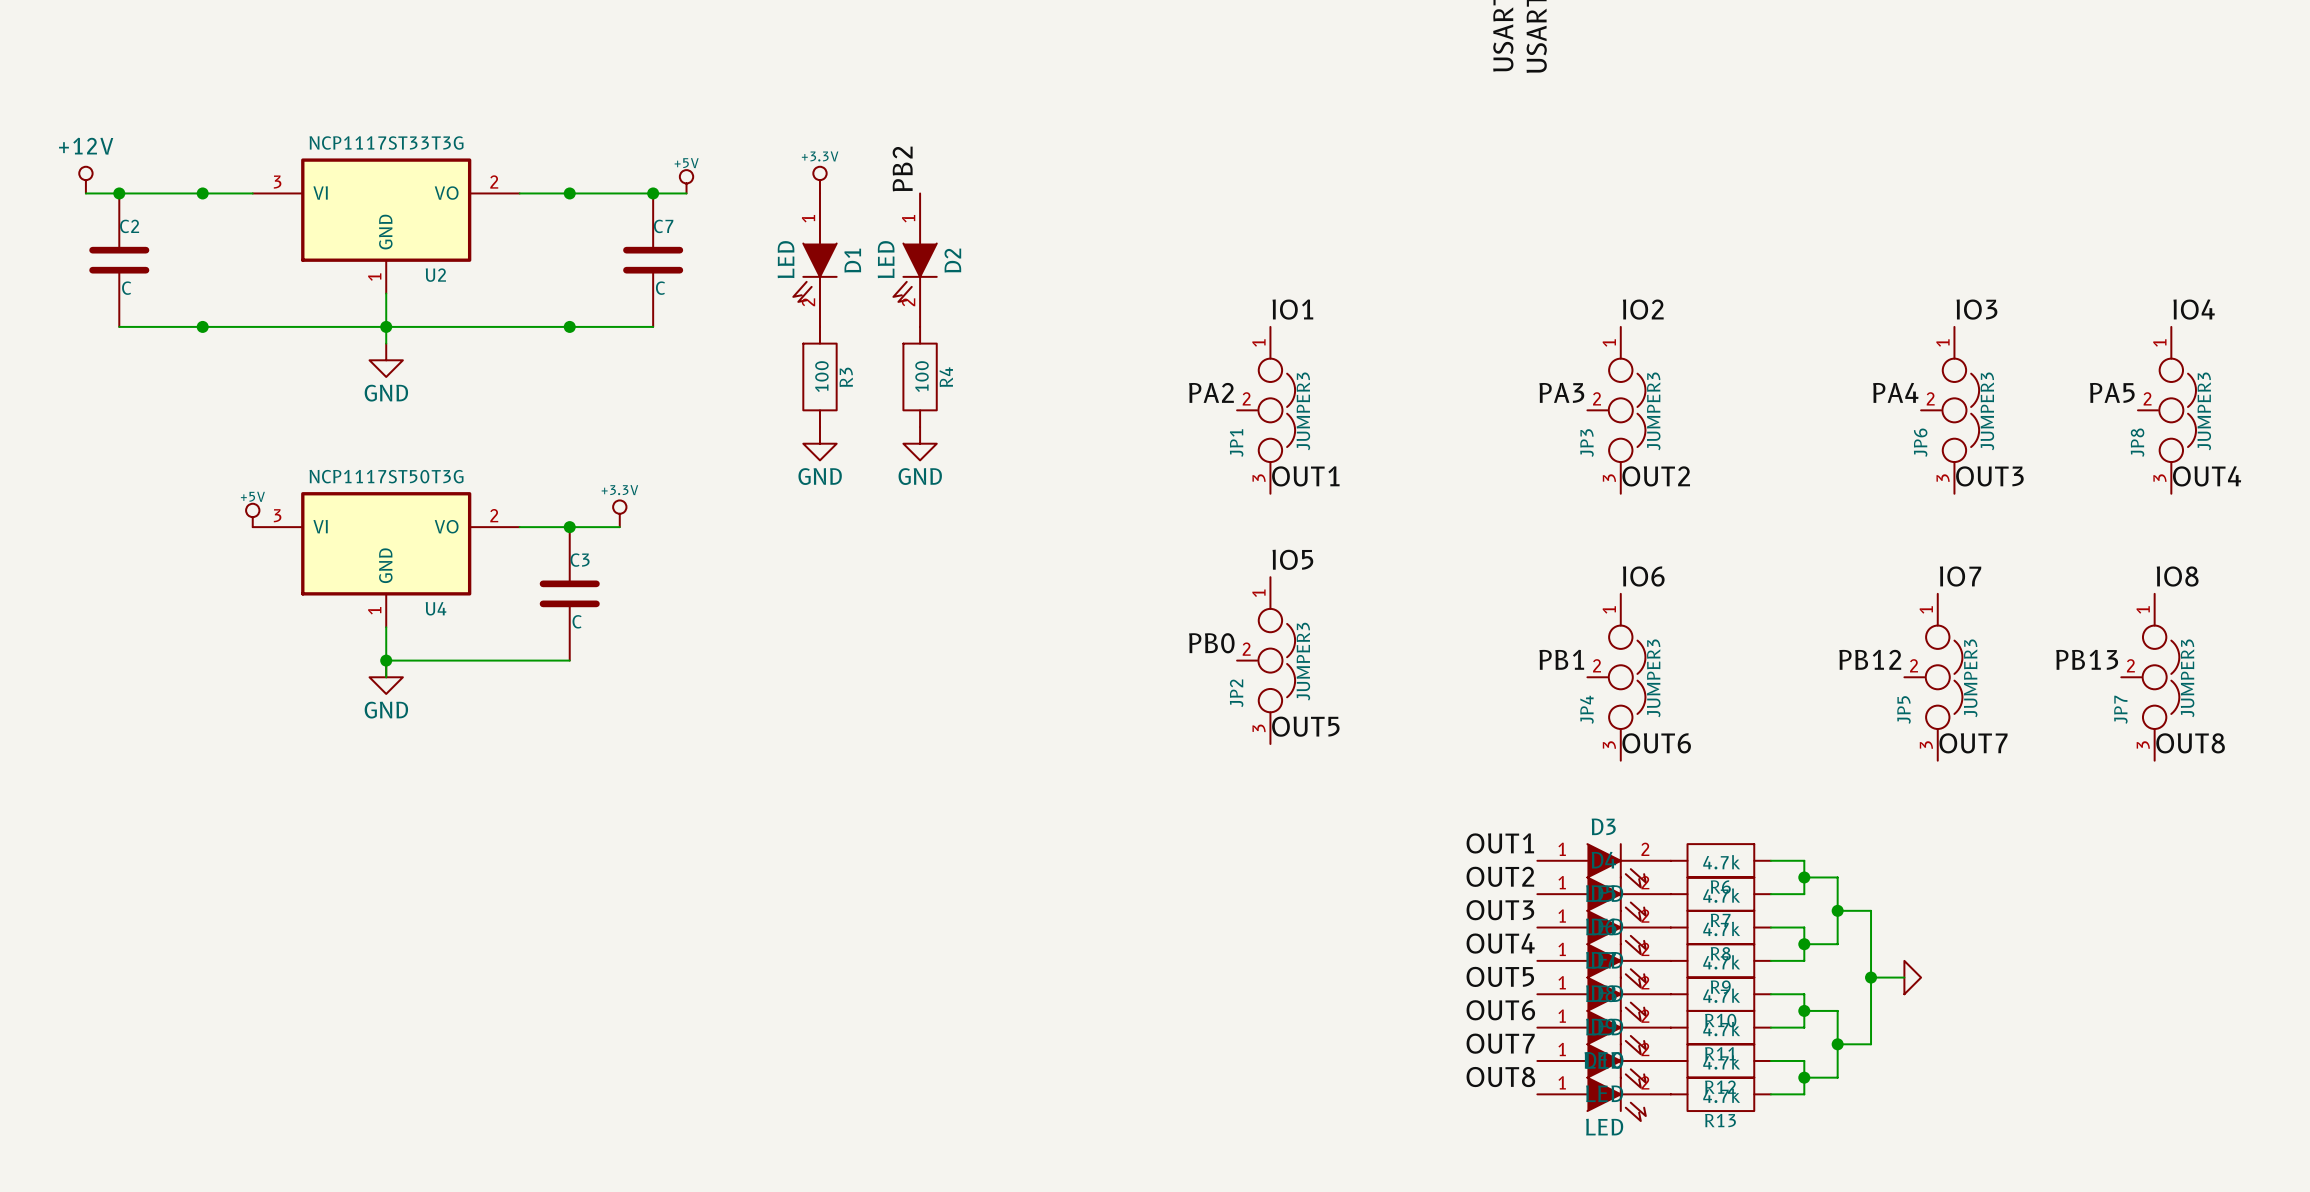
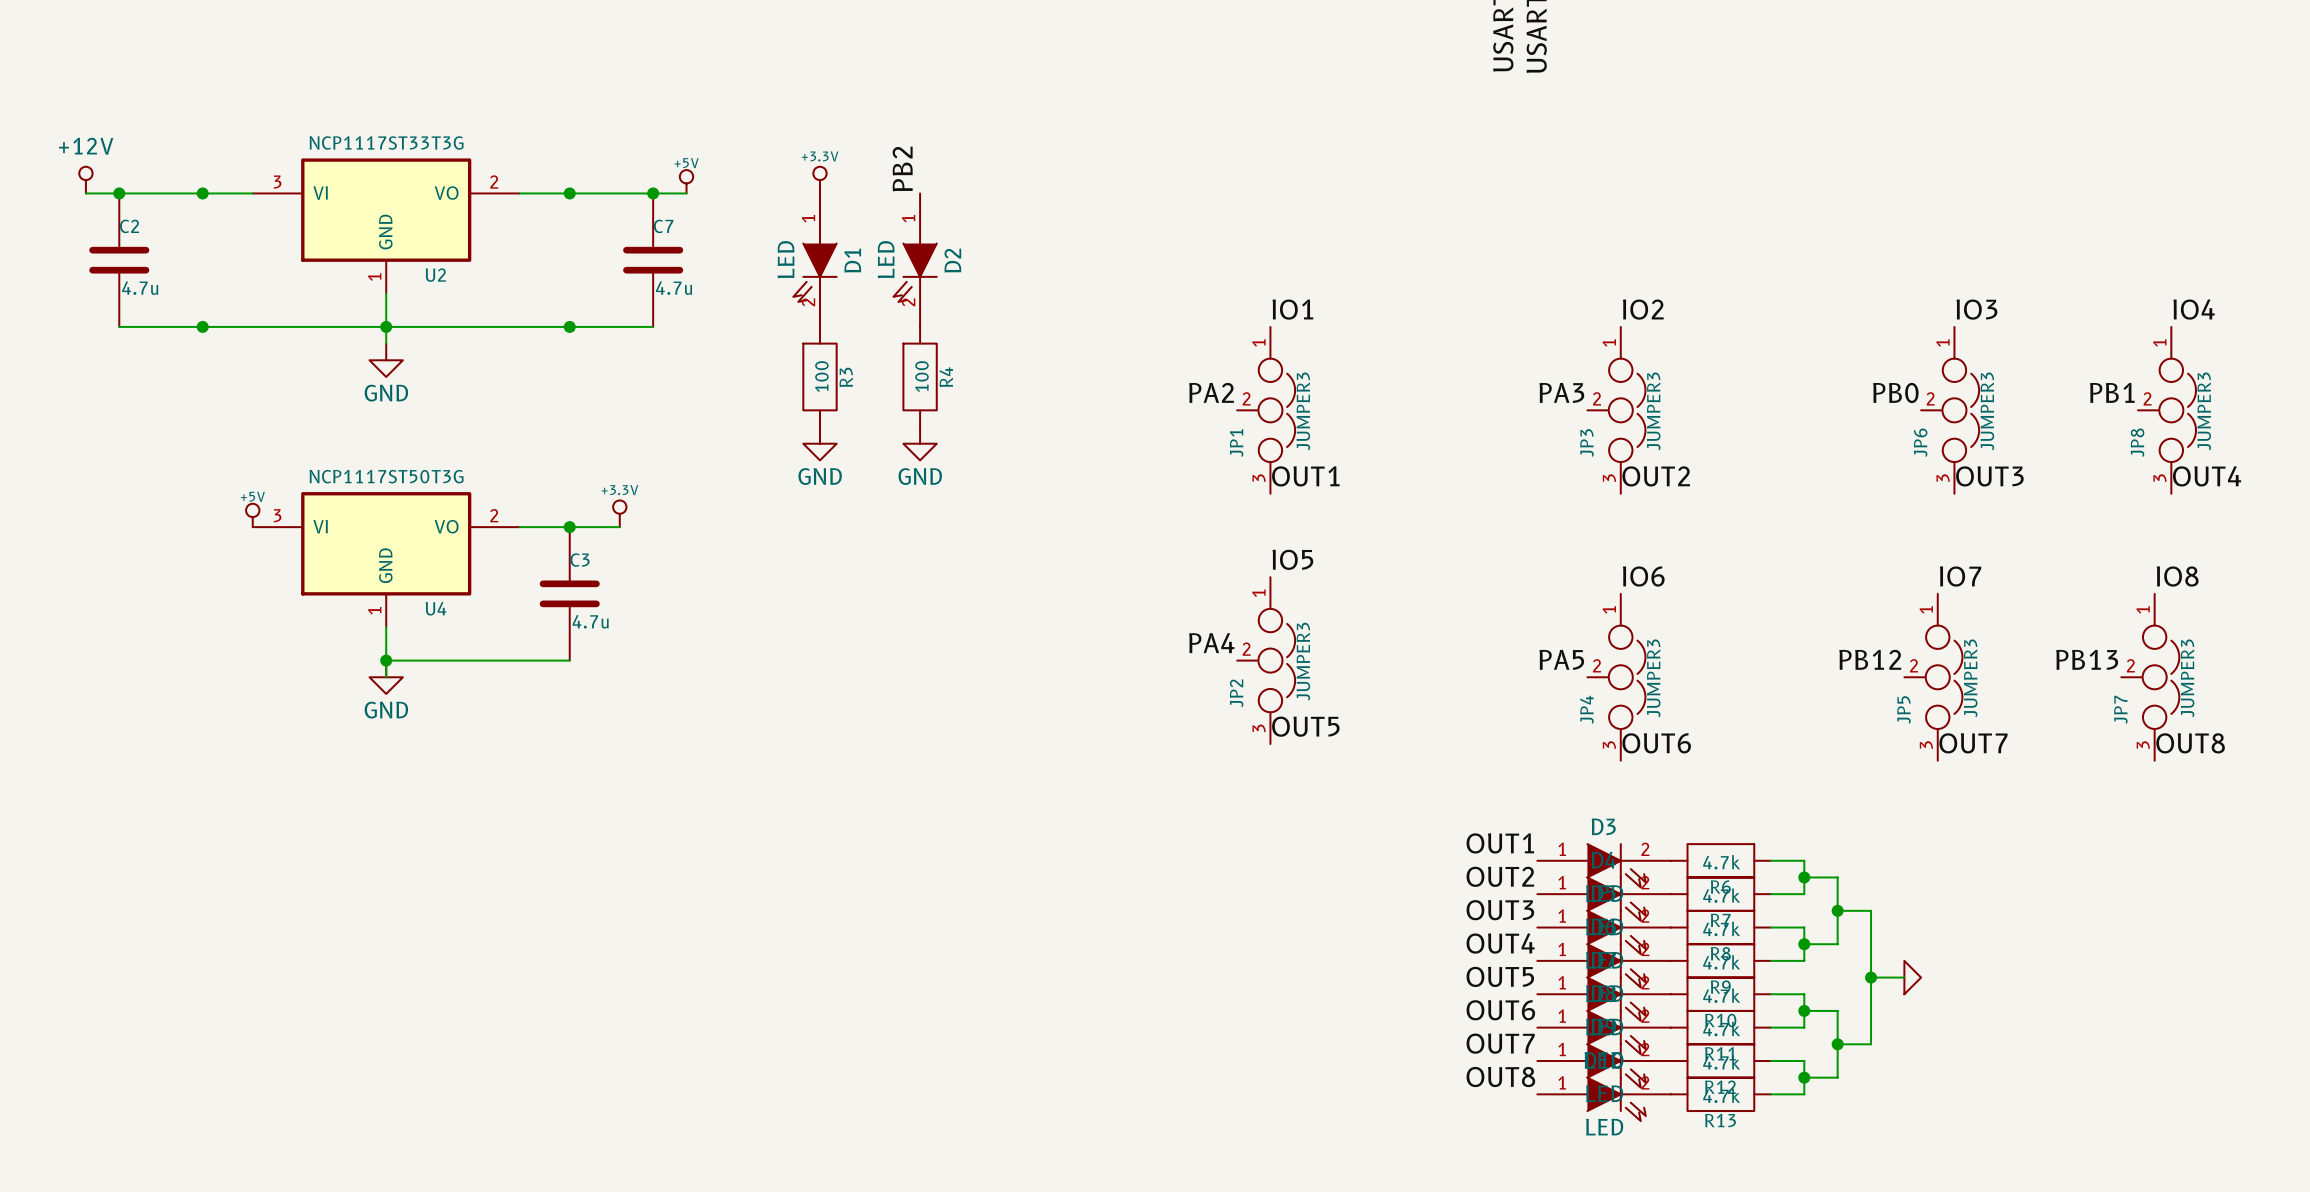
C2 value: C (126, 288) -> 4.7u (140, 288)
C7 value: C (660, 288) -> 4.7u (674, 288)
label: PA4 (1895, 392) -> PB0 (1895, 393)
label: PA5 (2112, 392) -> PB1 (2112, 392)
C3 value: C (577, 621) -> 4.7u (590, 621)
label: PB0 (1211, 643) -> PA4 (1211, 643)
label: PB1 (1561, 659) -> PA5 (1561, 659)

